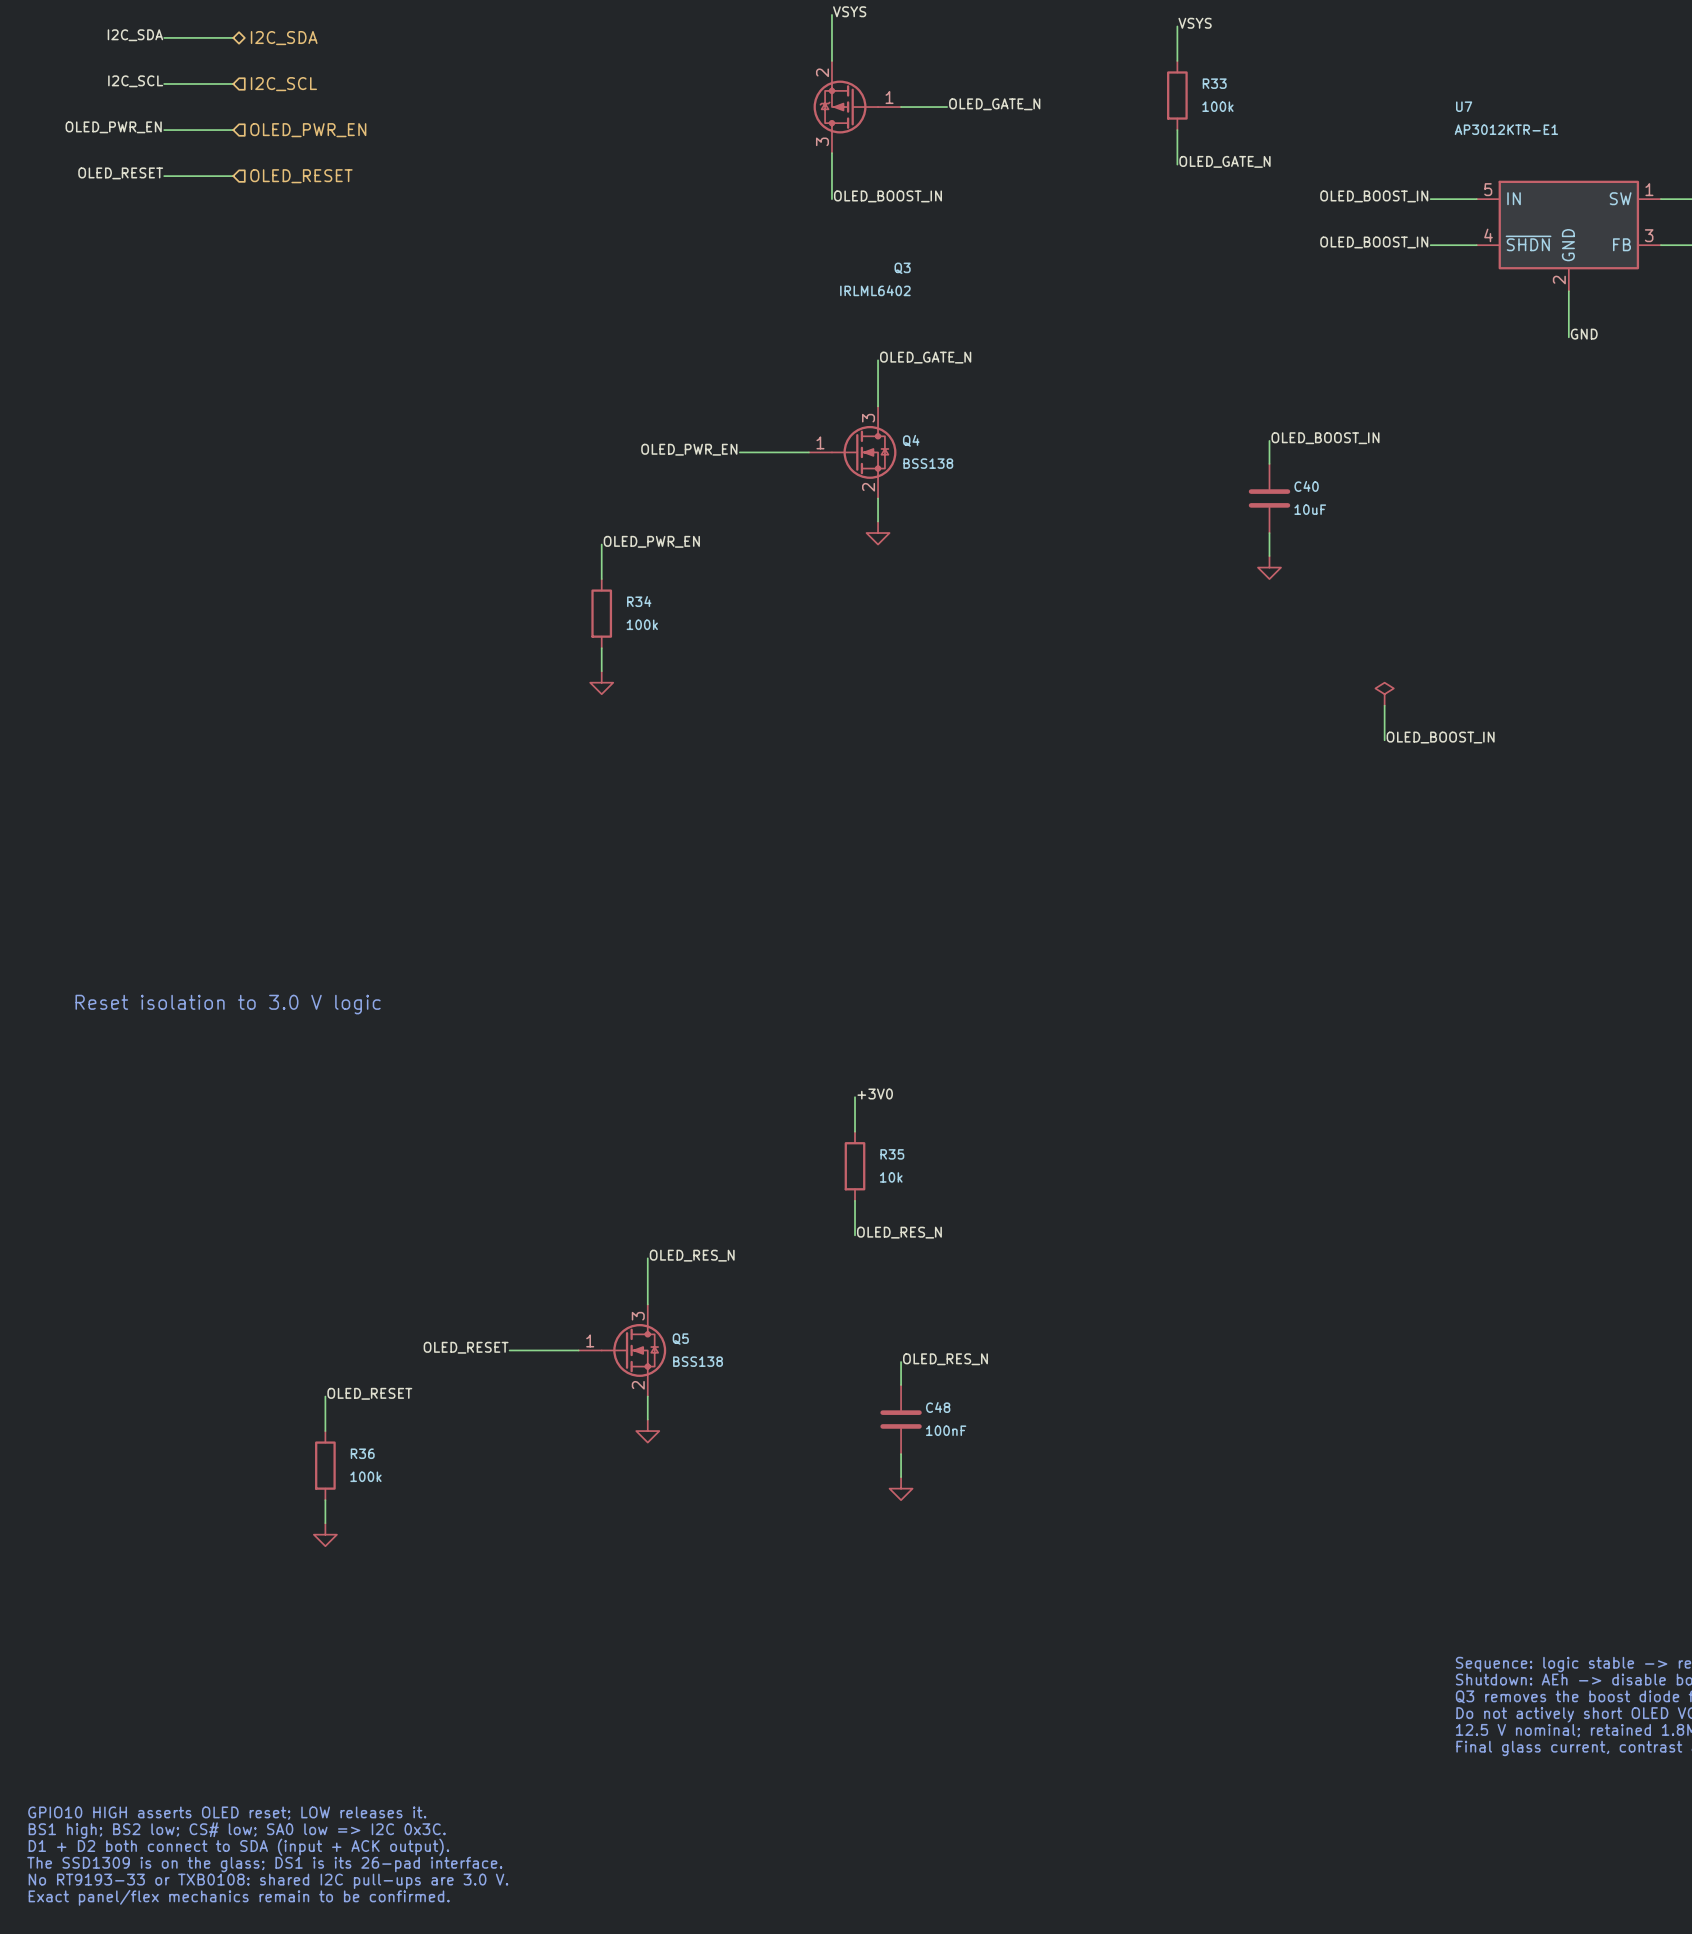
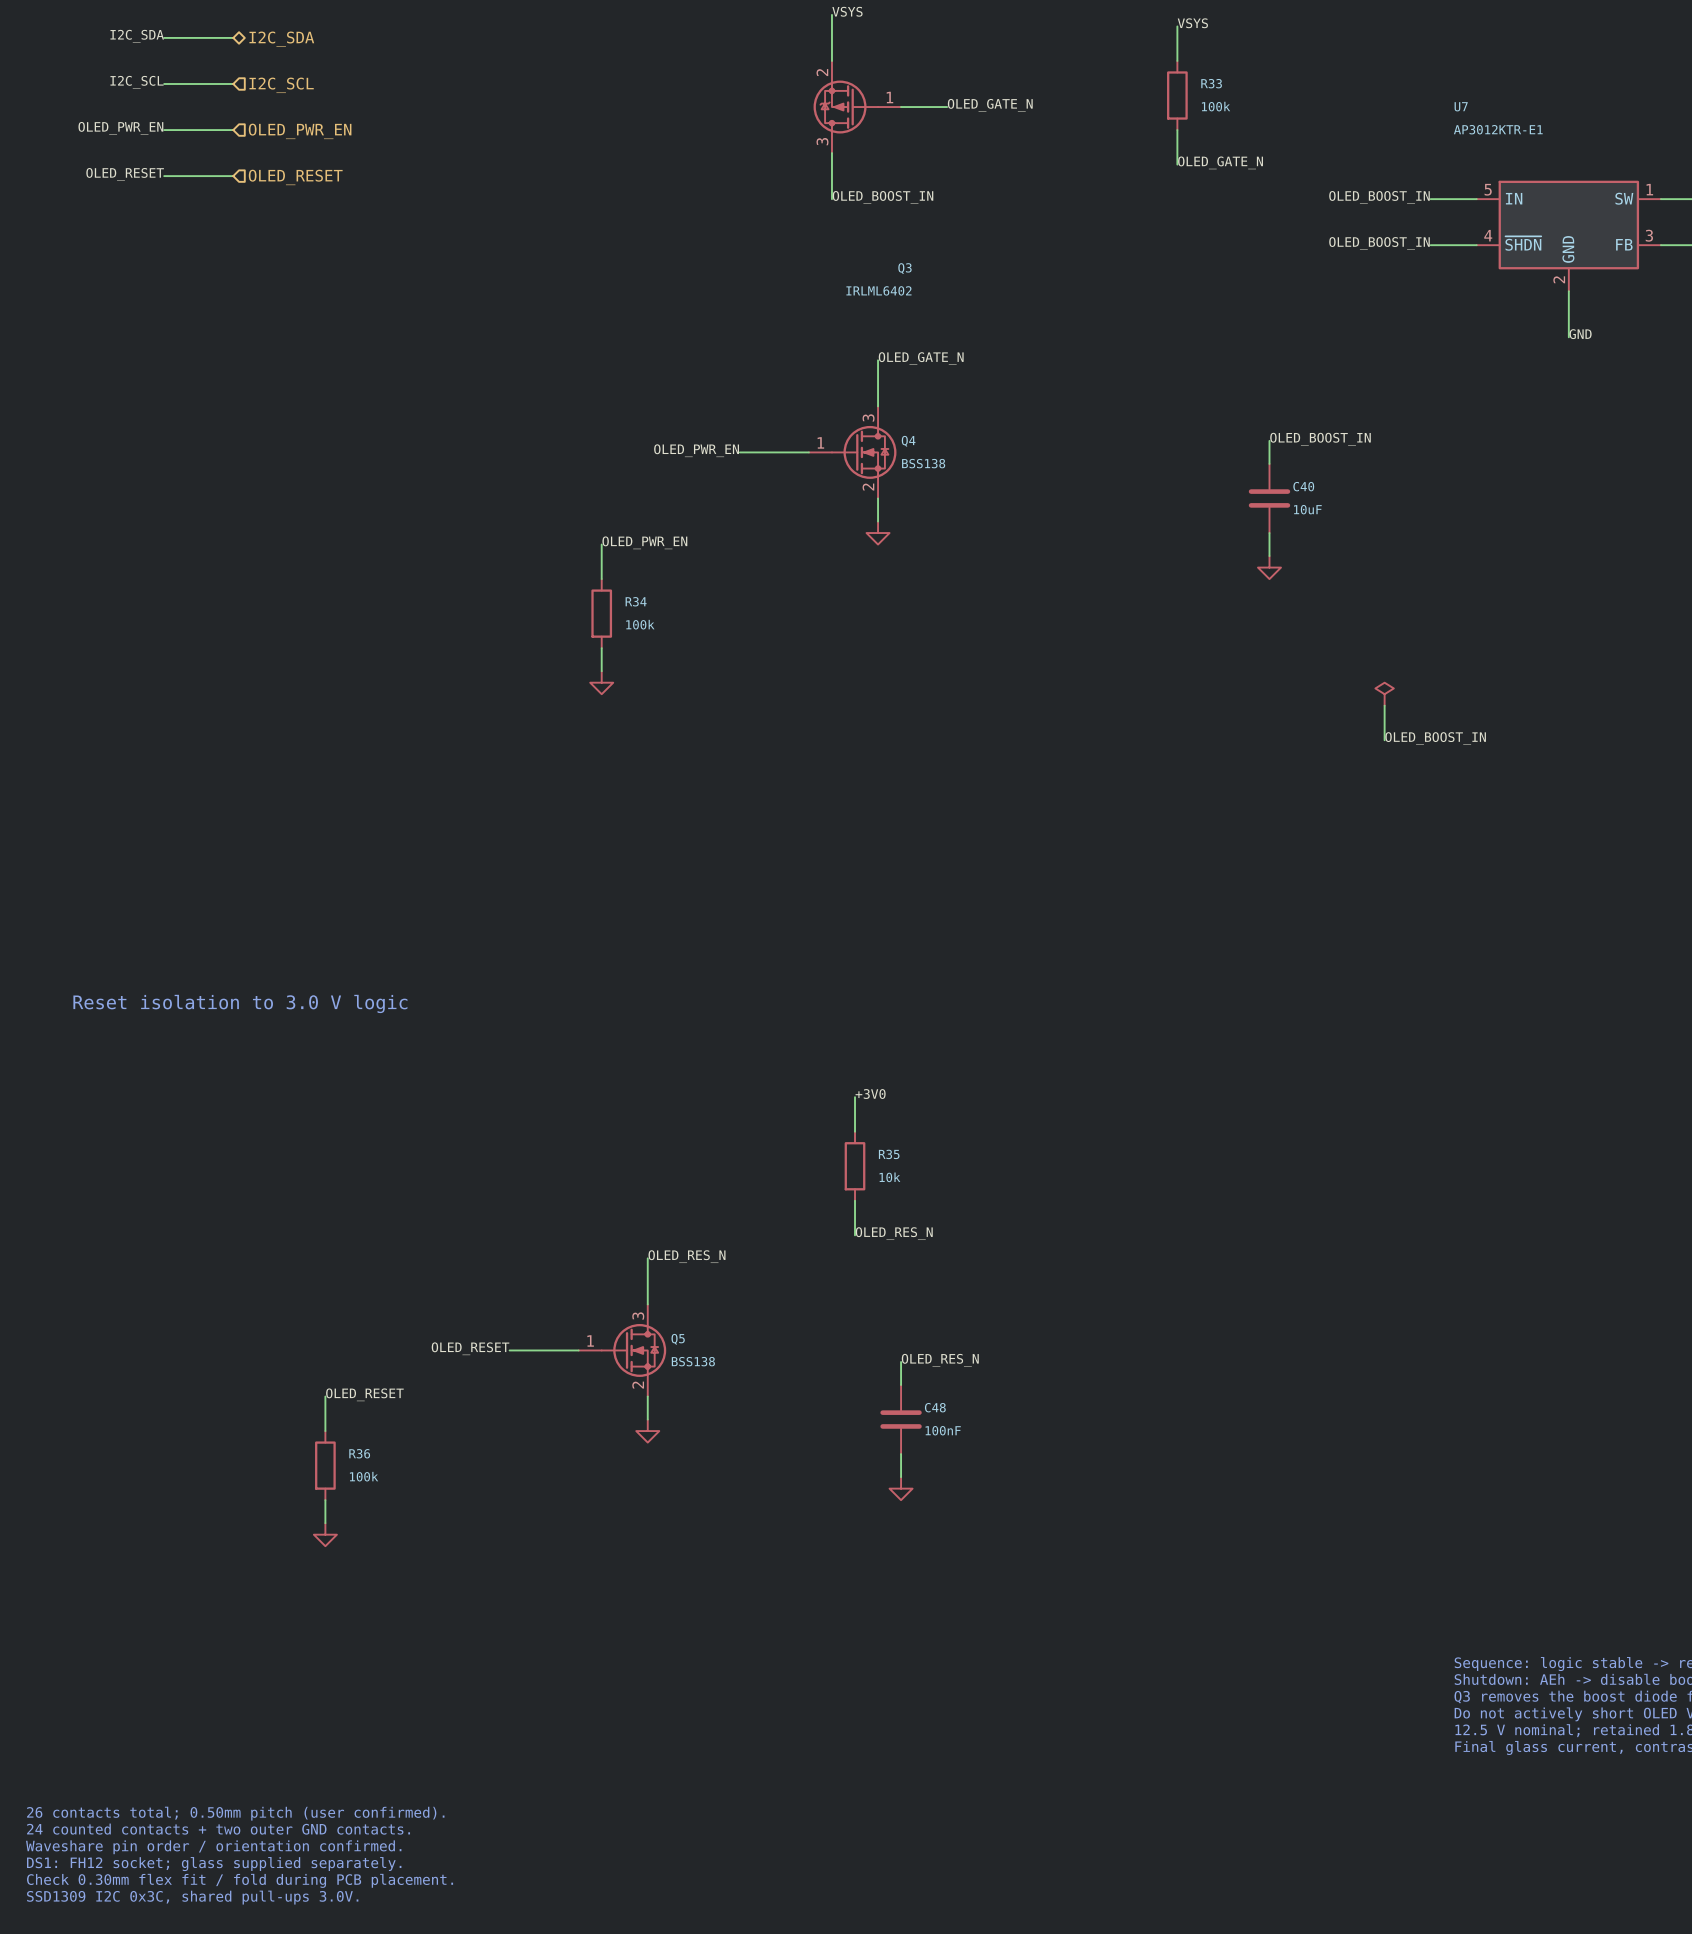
text: GPIO10 HIGH asserts OLED reset; LOW releases it. (227, 1813) -> 26 contacts total; 0.50mm pitch (user confirmed). (235, 1813)
text: BS1 high; BS2 low; CS# low; SA0 low => I2C 0x3C. (237, 1830) -> 24 counted contacts + two outer GND contacts. (218, 1829)
text: D1 + D2 both connect to SDA (input + ACK output). (238, 1847) -> Waveshare pin order / orientation confirmed. (213, 1847)
text: The SSD1309 is on the glass; DS1 is its 26-pad interface. (264, 1864) -> DS1: FH12 socket; glass supplied separately. (214, 1864)
text: No RT9193-33 or TXB0108: shared I2C pull-ups are 3.0 V. (268, 1881) -> Check 0.30mm flex fit / fold during PCB placement. (240, 1880)
text: Exact panel/flex mechanics remain to be confirmed. (239, 1897) -> SSD1309 I2C 0x3C, shared pull-ups 3.0V. (192, 1897)

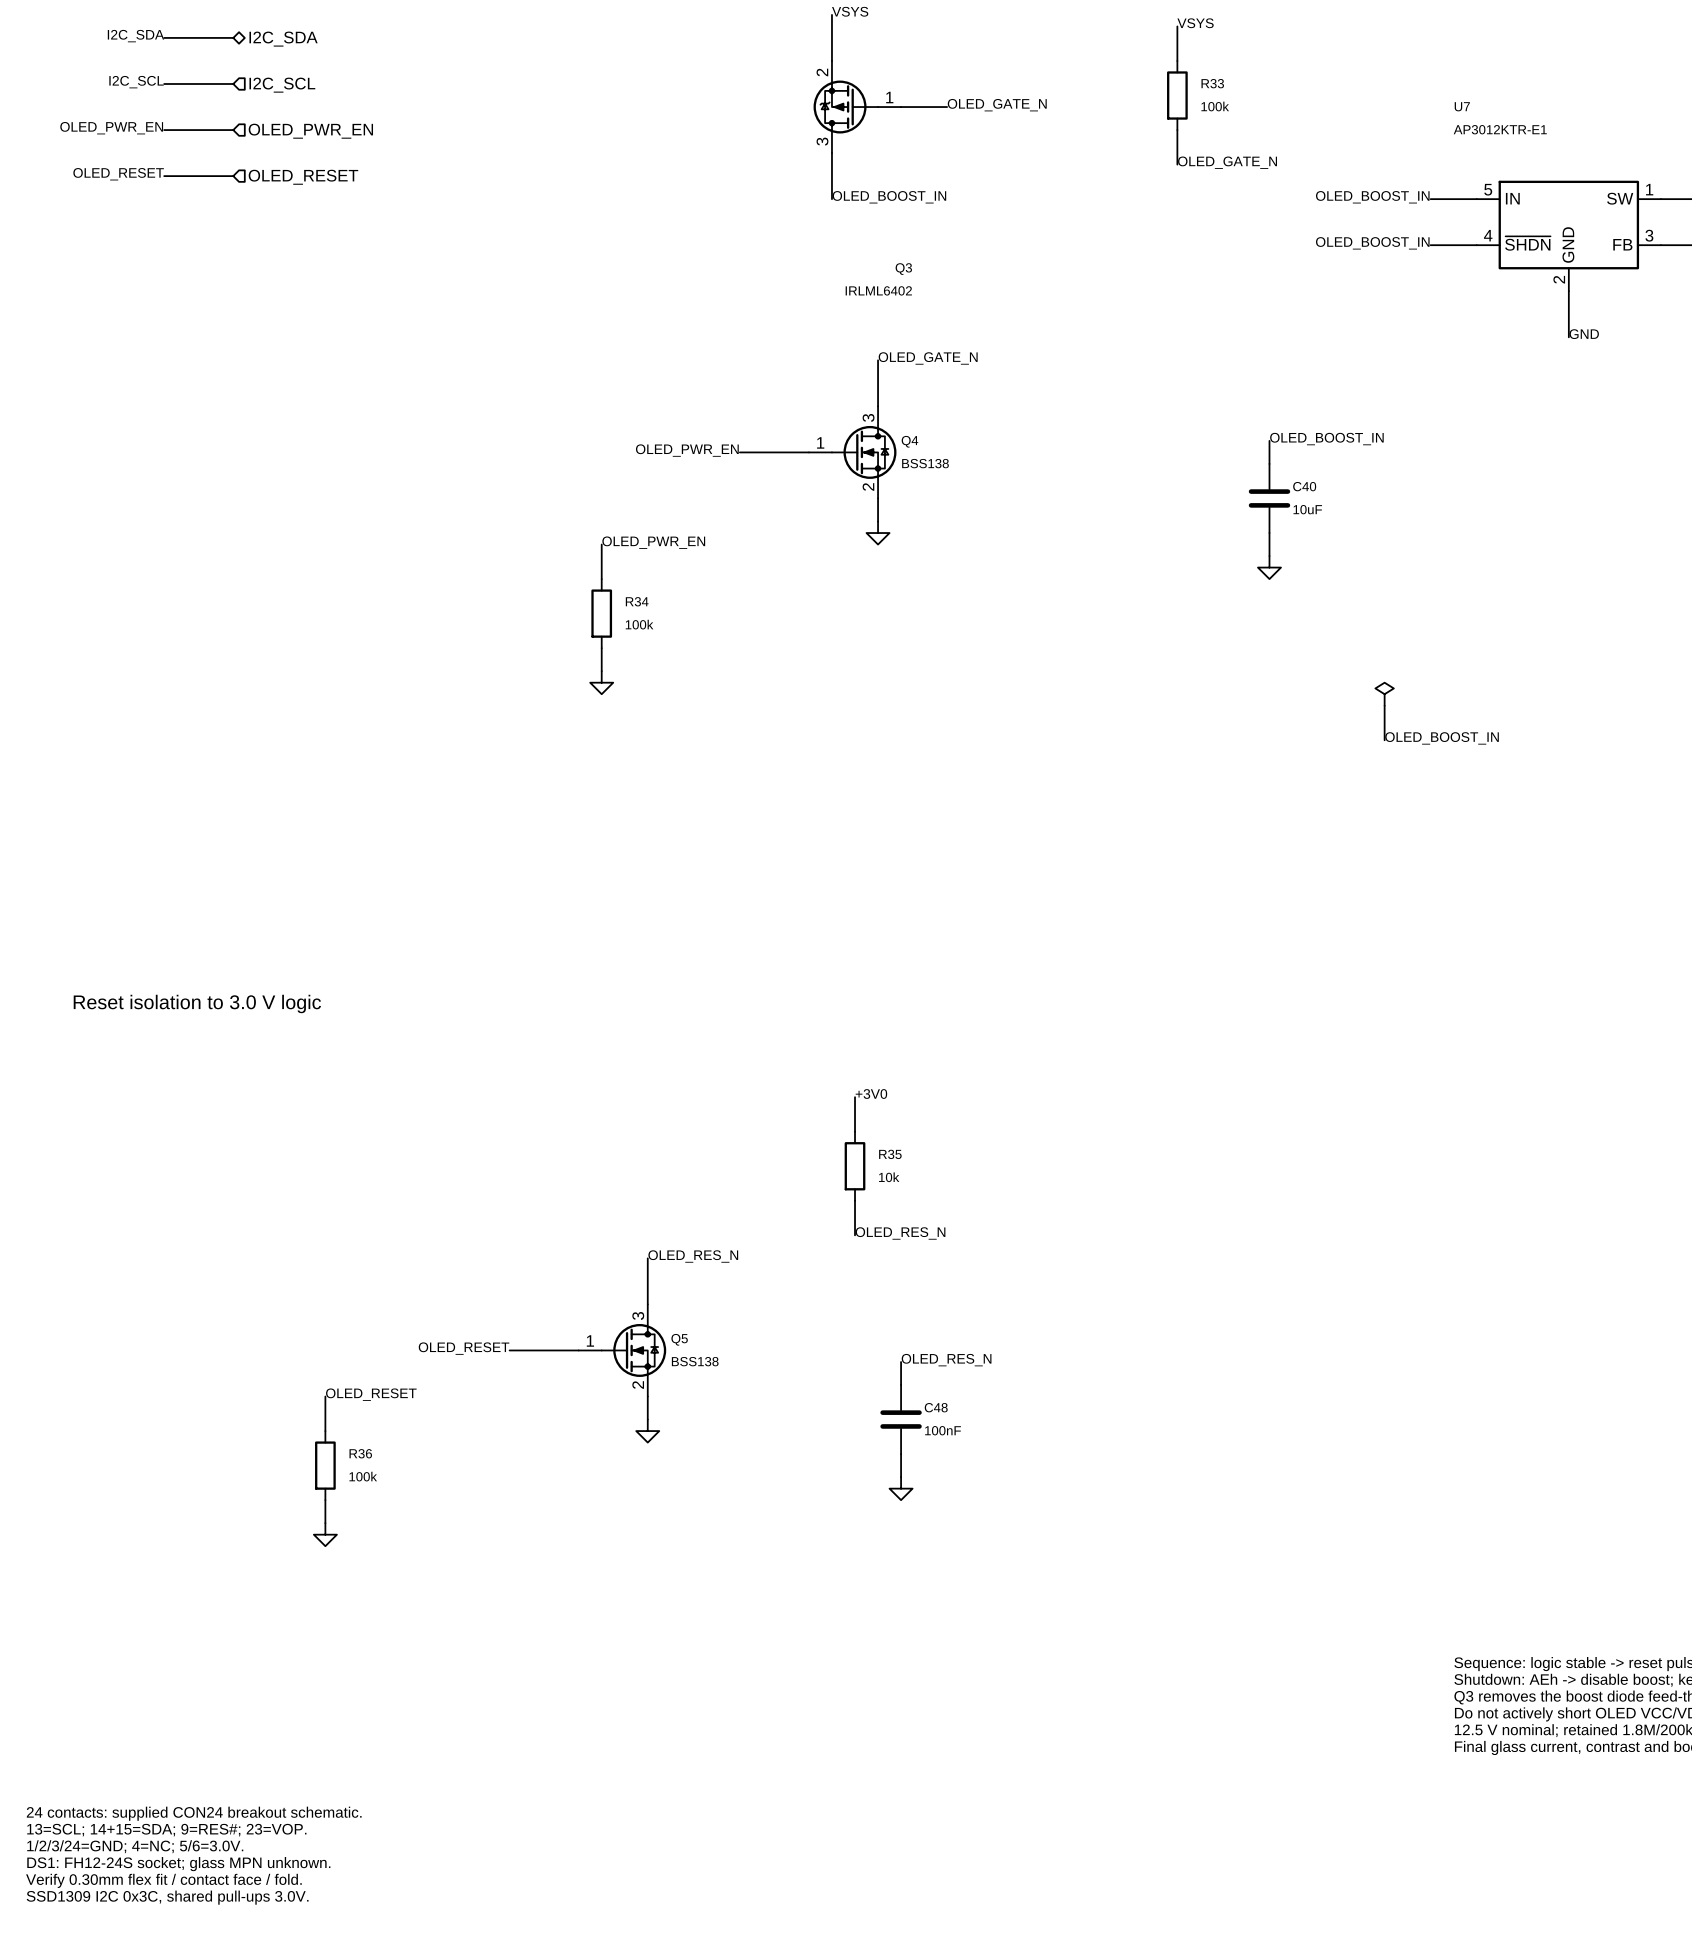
text: 26 contacts total; 0.50mm pitch (user confirmed). (235, 1813) -> 24 contacts: supplied CON24 breakout schematic. (194, 1813)
text: 24 counted contacts + two outer GND contacts. (218, 1829) -> 13=SCL; 14+15=SDA; 9=RES#; 23=VOP. (166, 1830)
text: Waveshare pin order / orientation confirmed. (213, 1847) -> 1/2/3/24=GND; 4=NC; 5/6=3.0V. (135, 1846)
text: DS1: FH12 socket; glass supplied separately. (214, 1864) -> DS1: FH12-24S socket; glass MPN unknown. (178, 1864)
text: Check 0.30mm flex fit / fold during PCB placement. (240, 1880) -> Verify 0.30mm flex fit / contact face / fold. (163, 1880)

